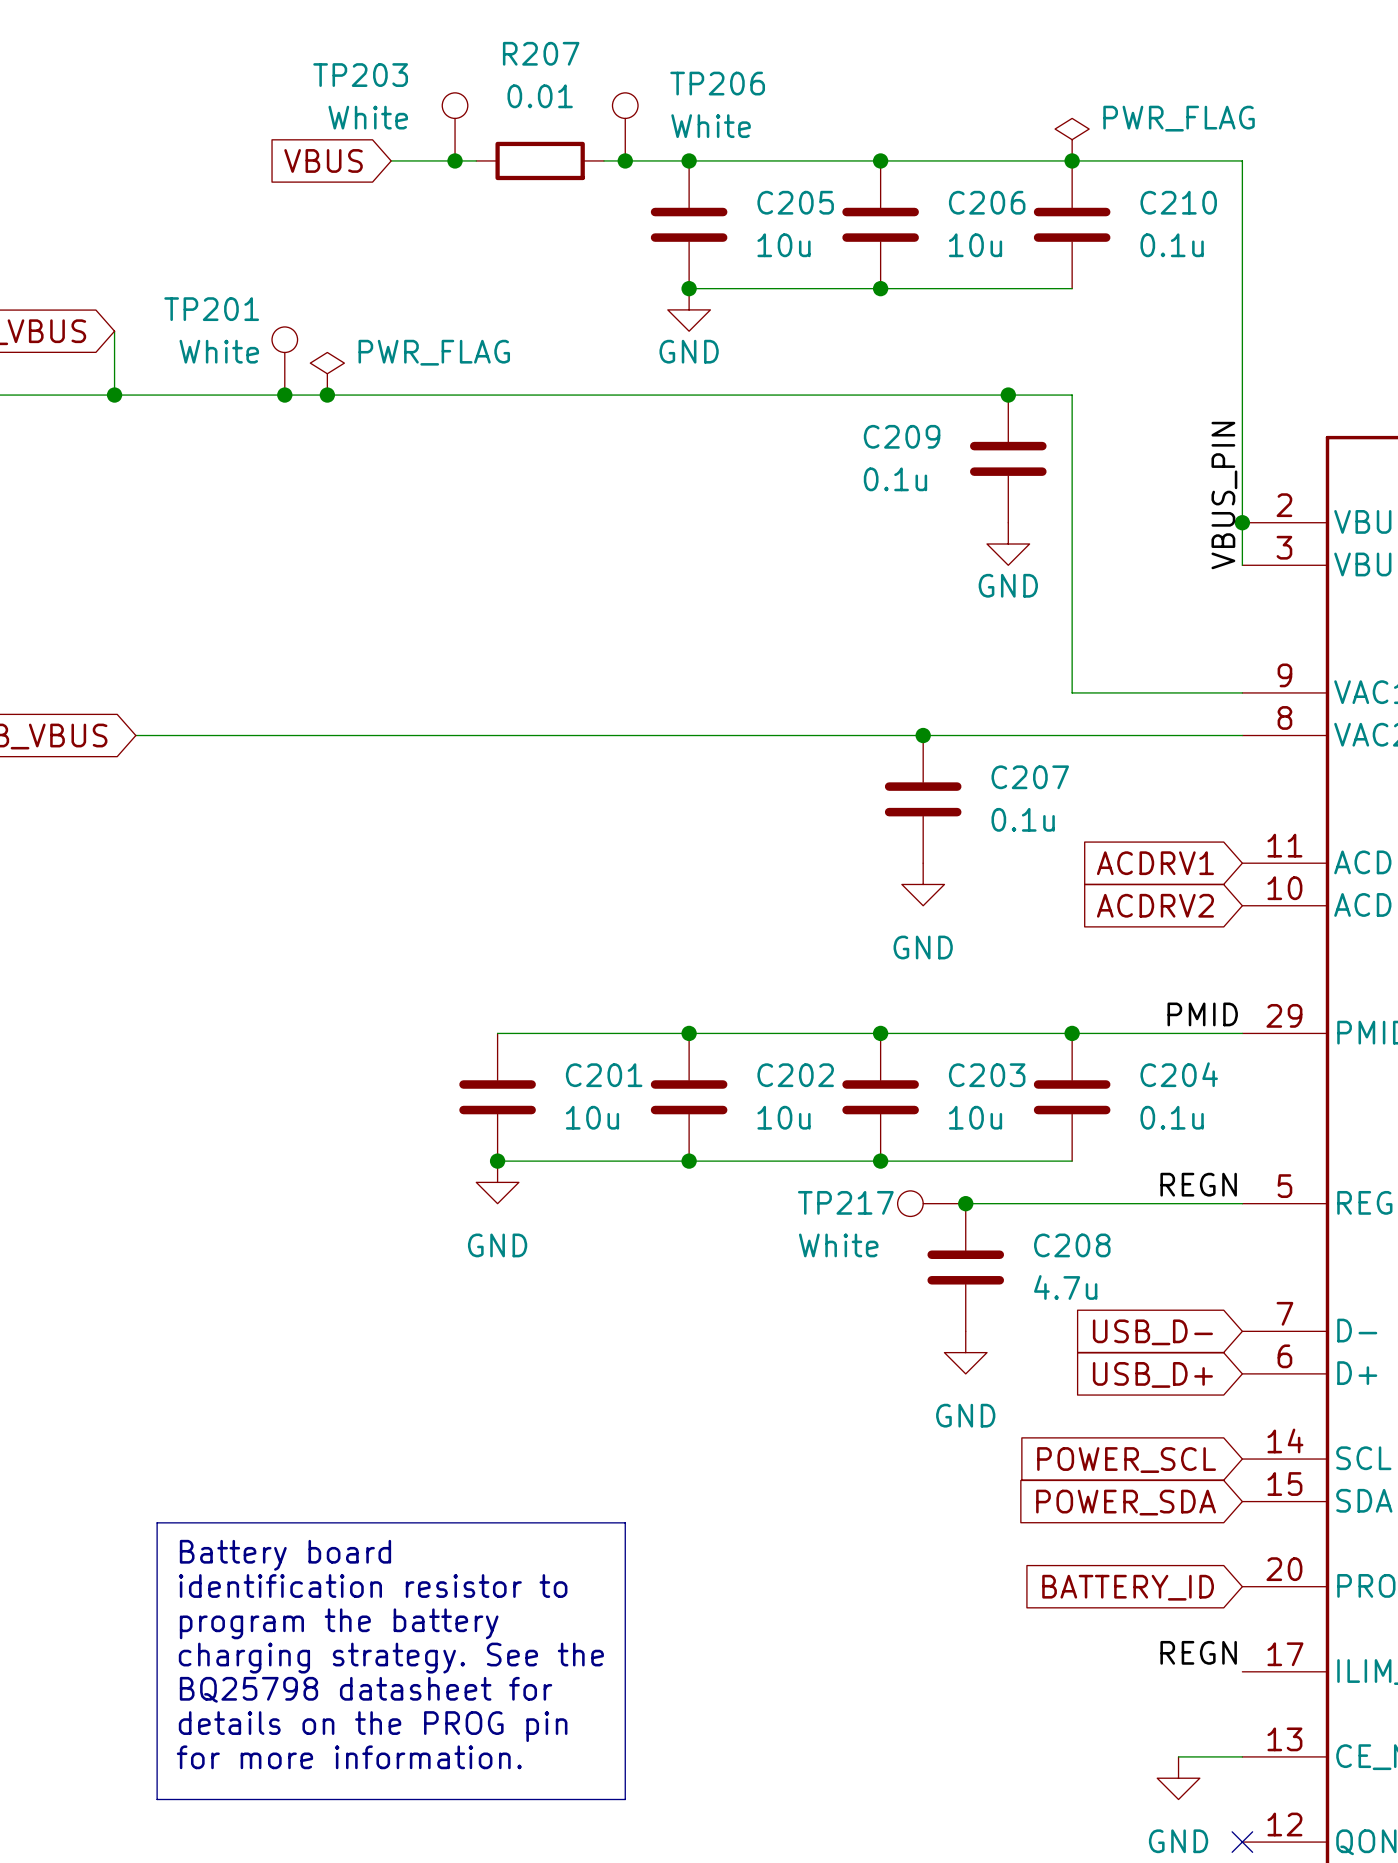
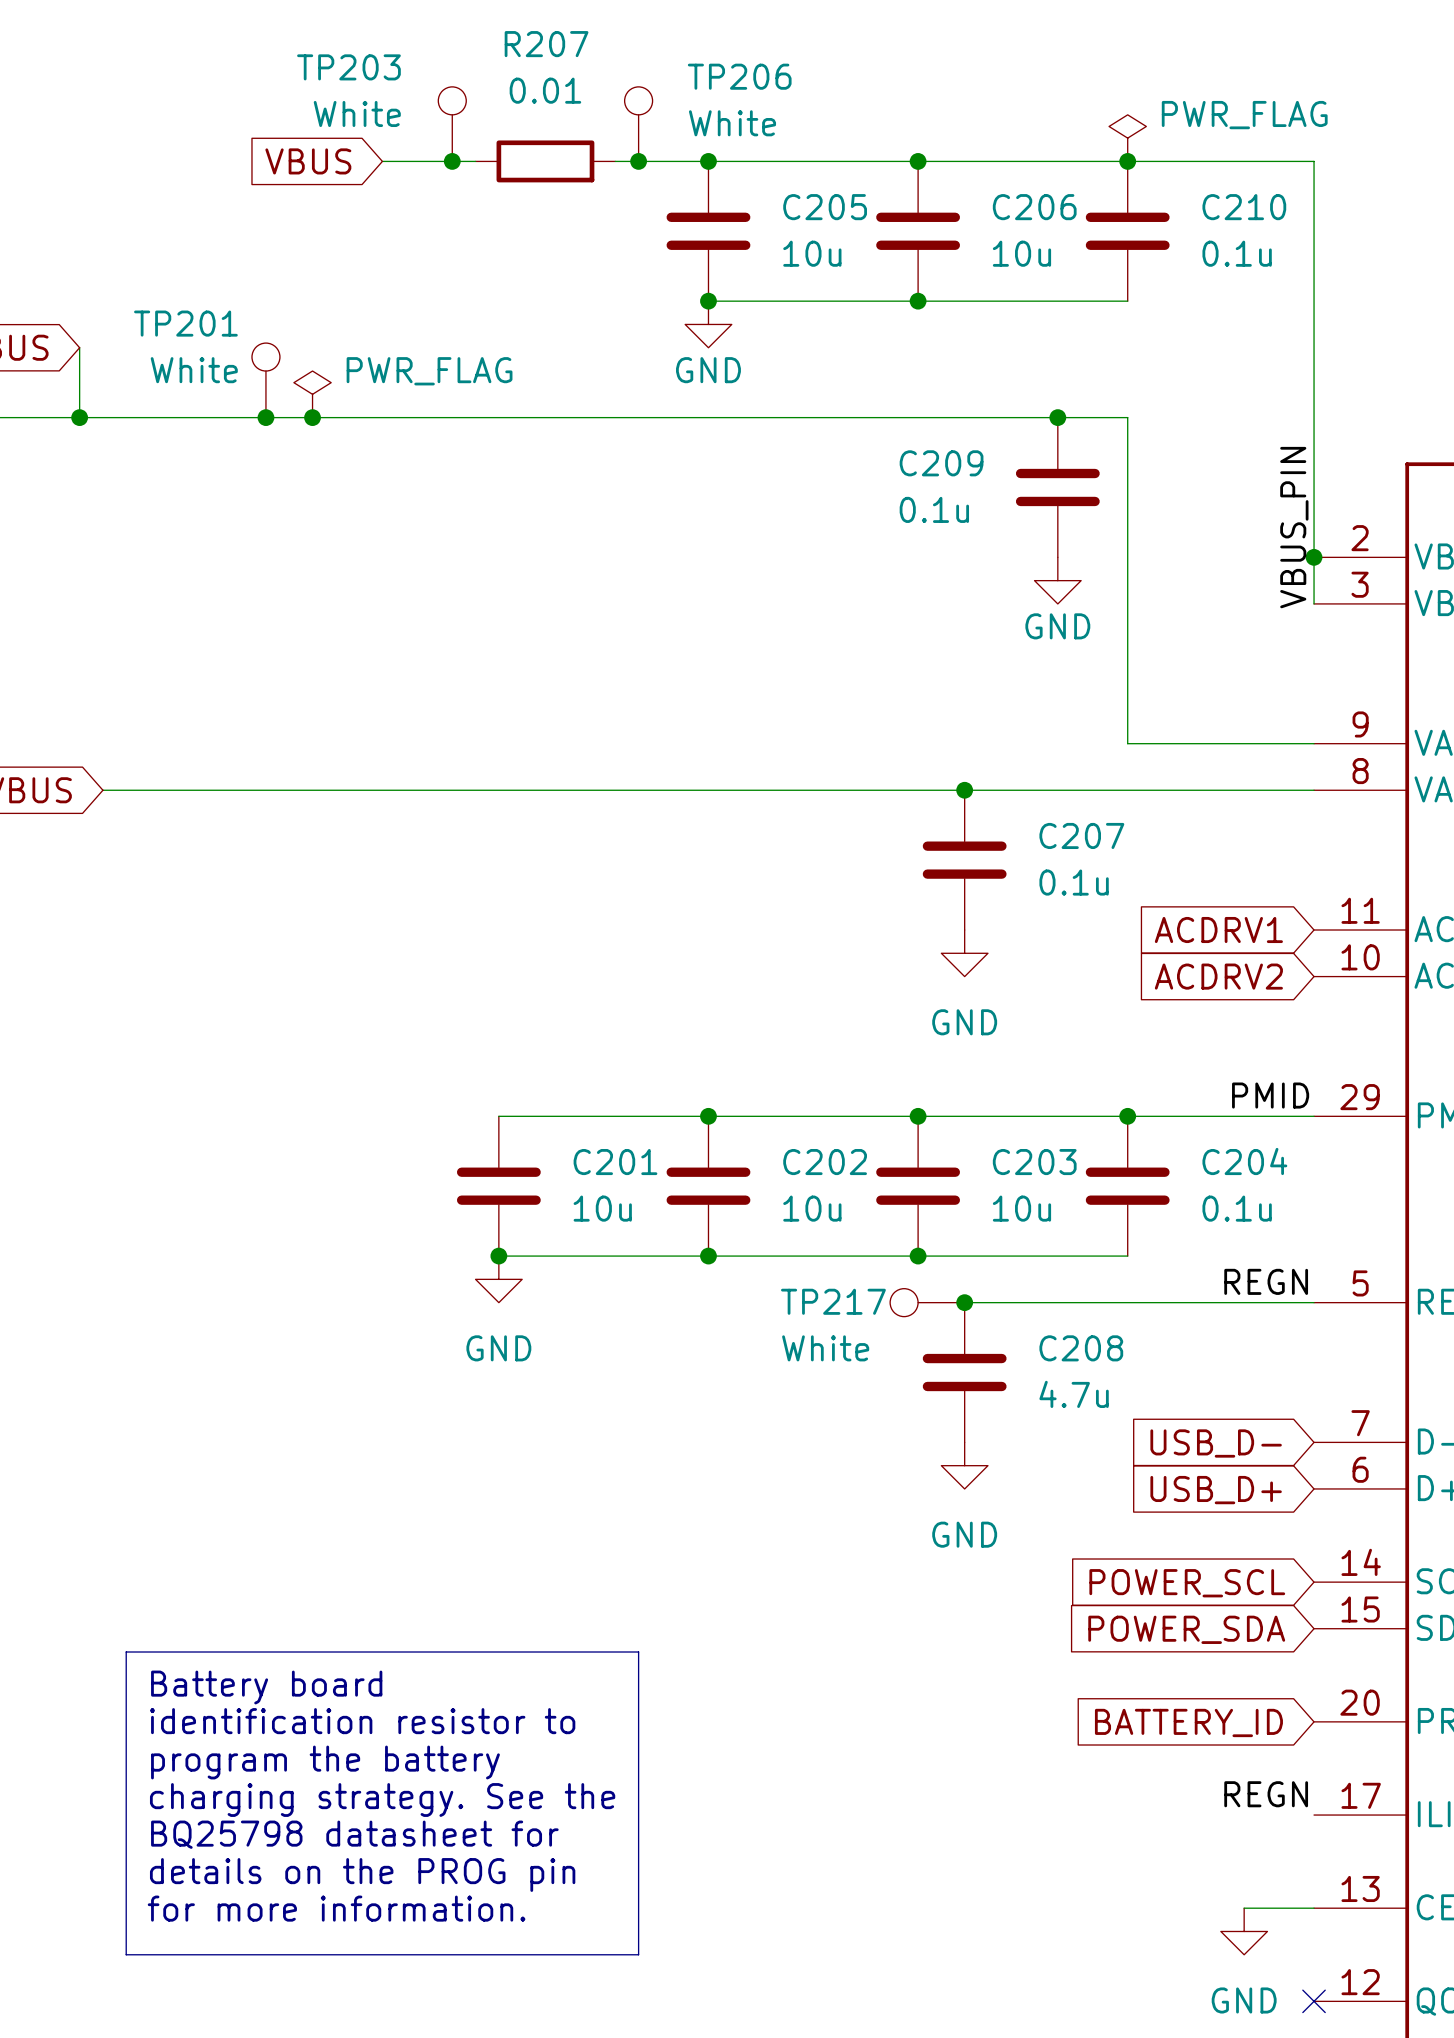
TP217 position: (931, 1203) -> (927, 1302)
junction position: (965, 1203) -> (964, 1302)
C208 position: (965, 1267) -> (964, 1372)
power symbol position: GND (965, 1352) -> GND (964, 1465)

